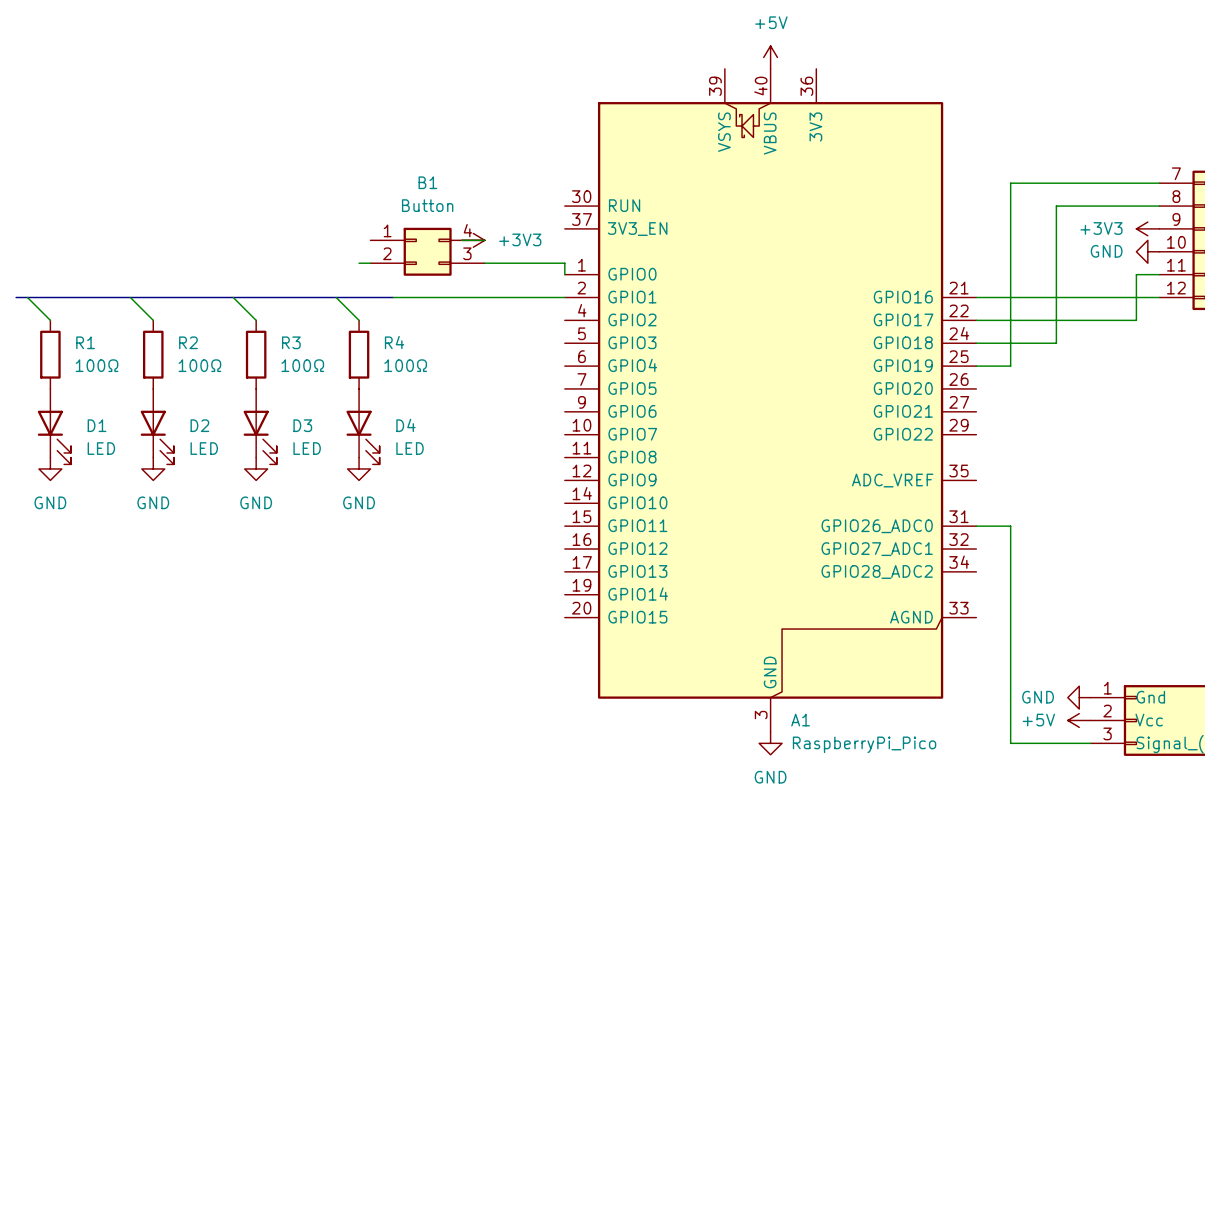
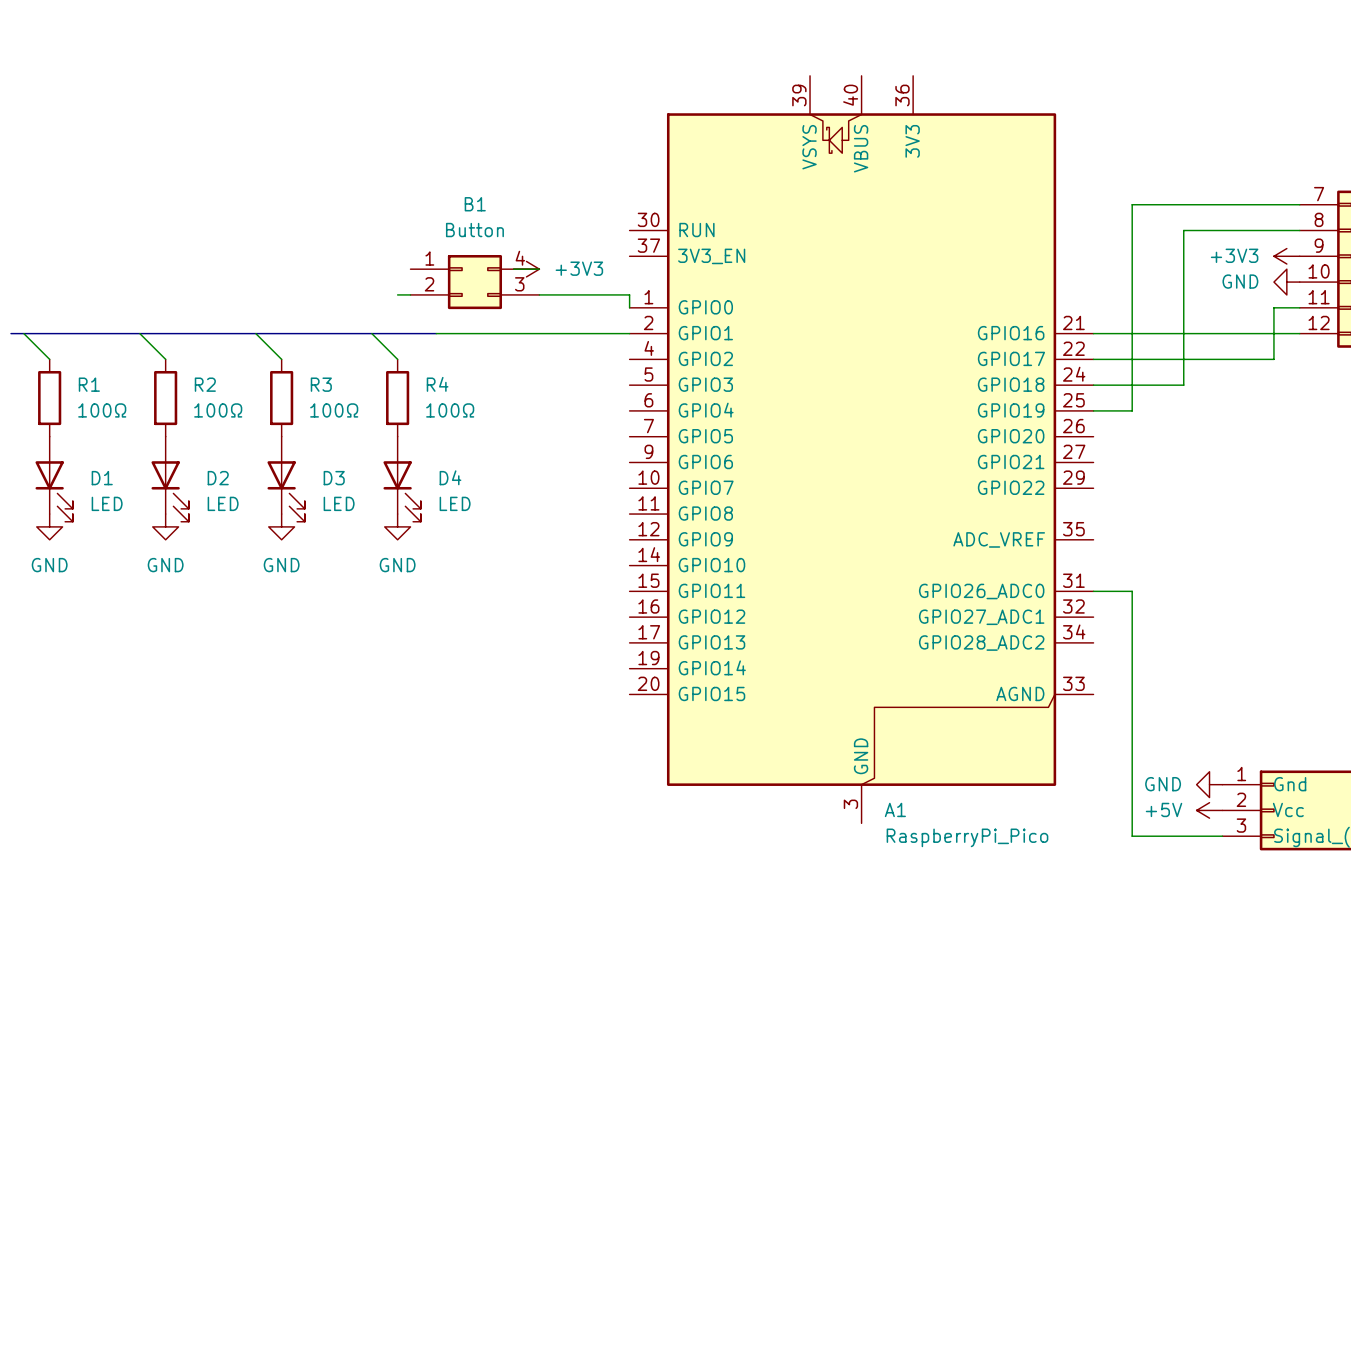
power symbol: +5V (770, 57) -> none
power symbol: GND (770, 743) -> none

